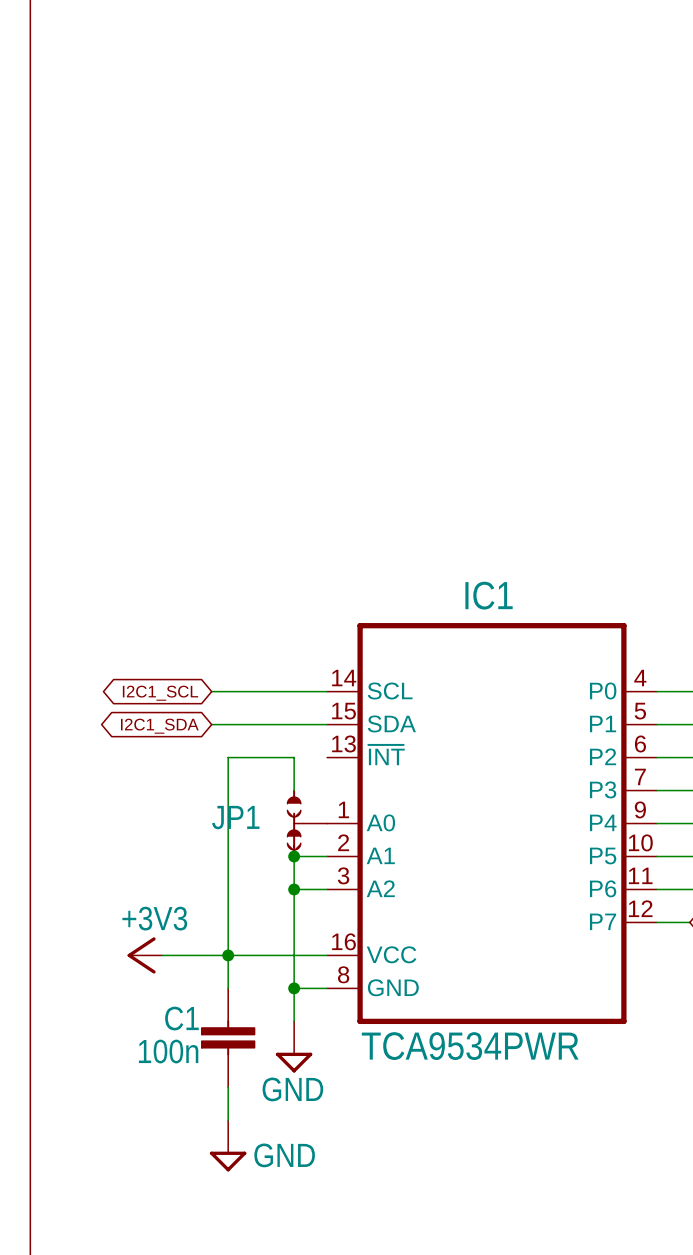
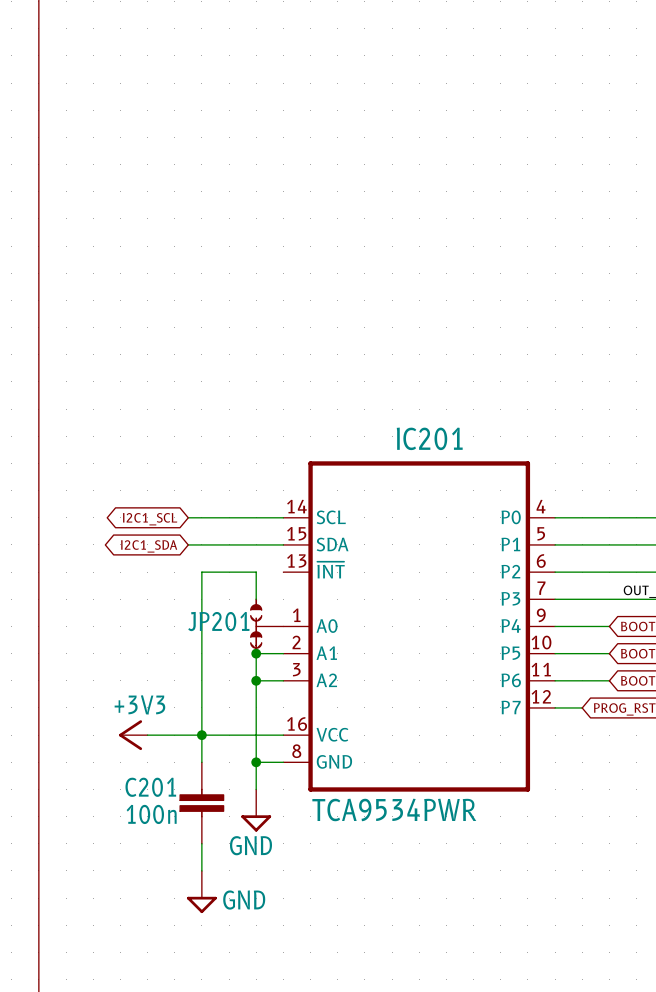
IC1 name: IC1 (489, 595) -> IC201 (429, 438)
JP1 name: JP1 (235, 817) -> JP201 (218, 621)
C1 name: C1 (181, 1018) -> C201 (150, 787)

